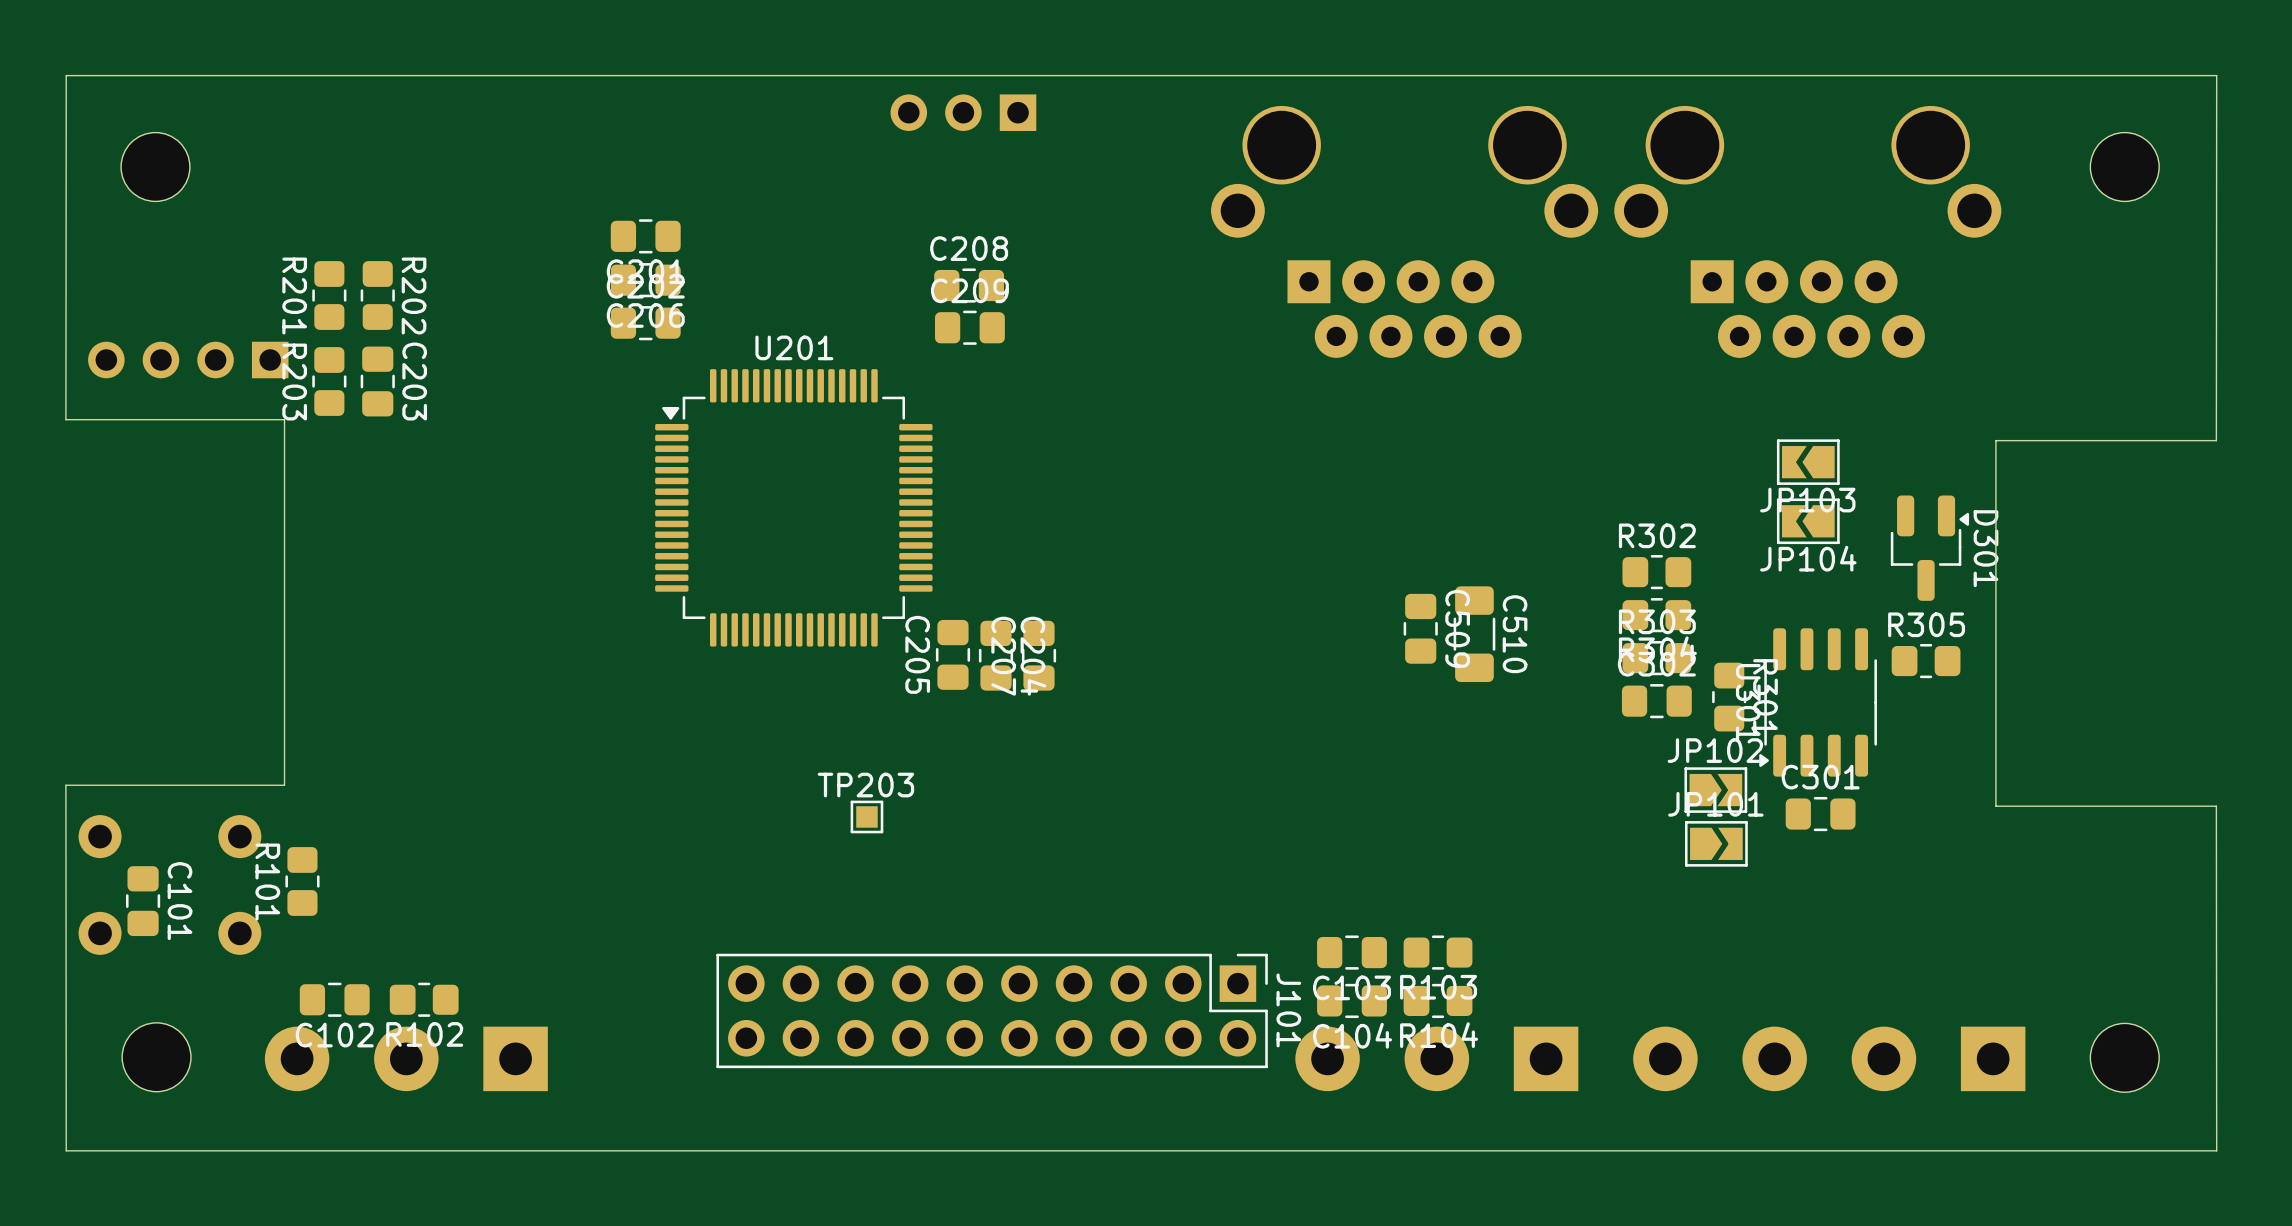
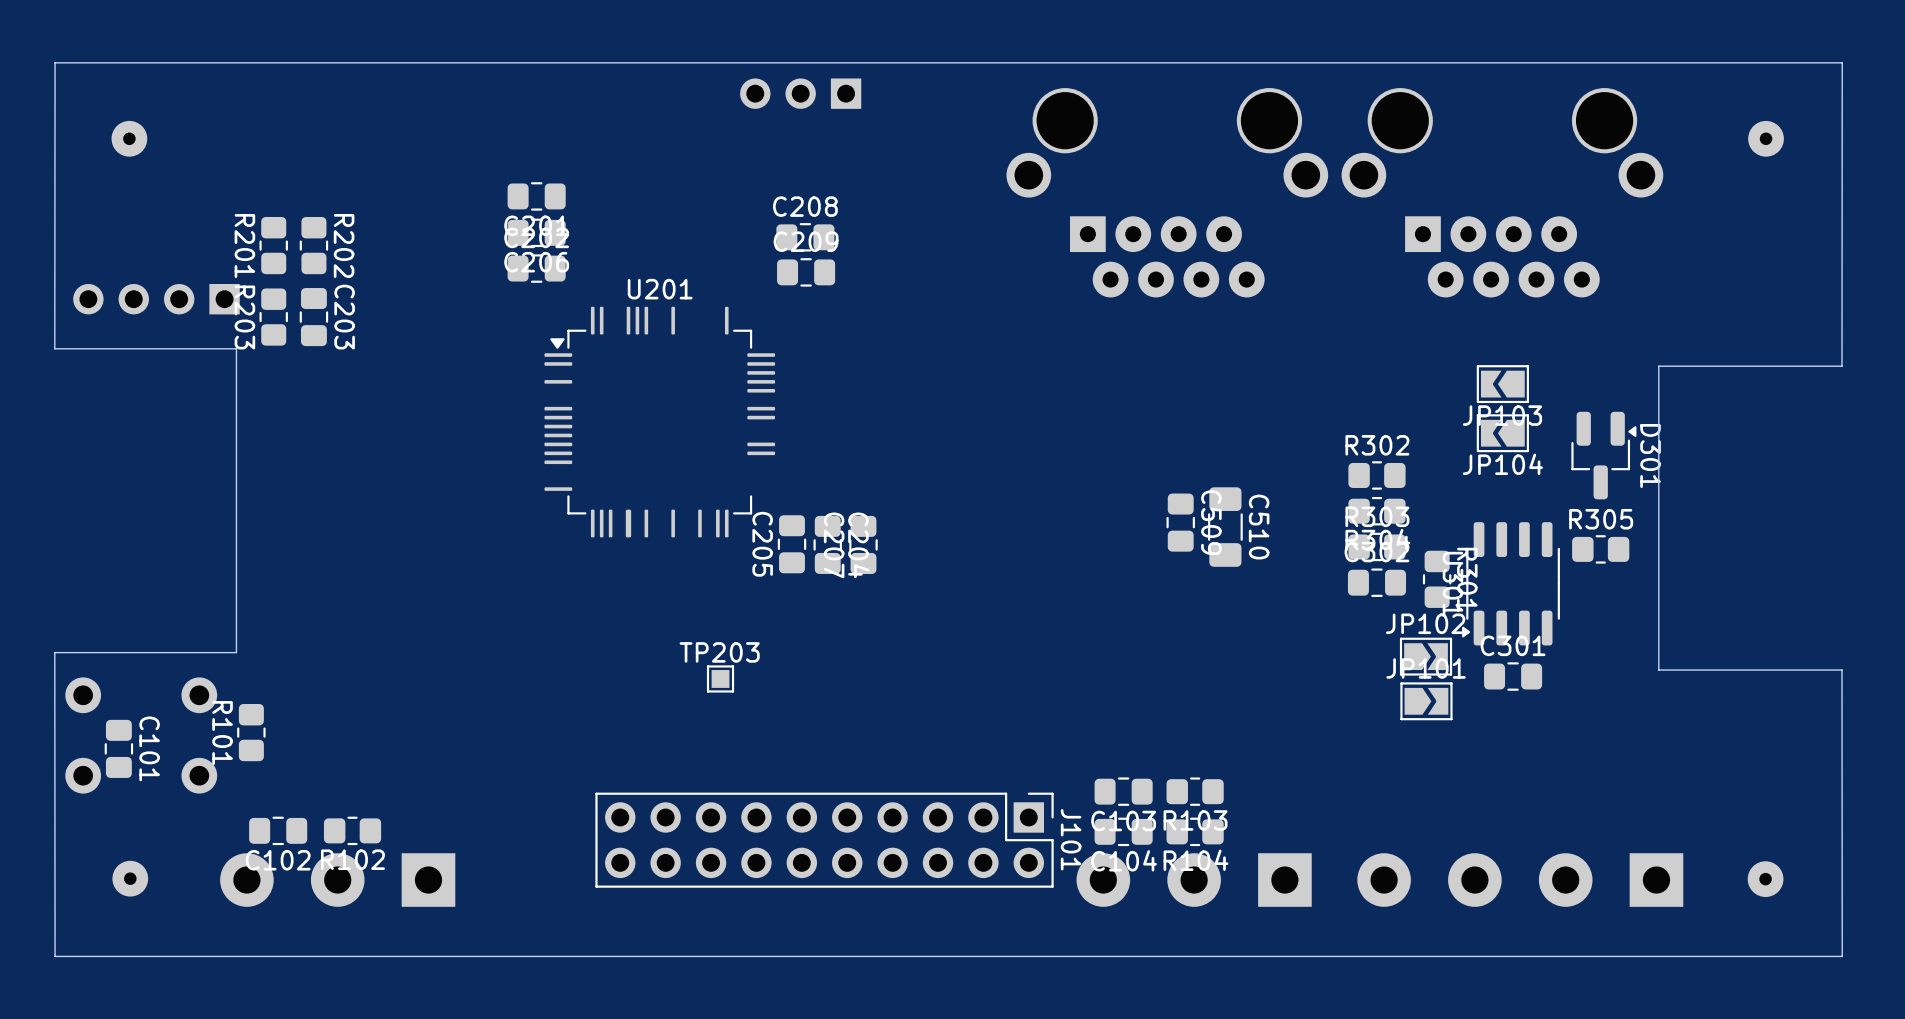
part footprint: [121, 132, 190, 202] -> [111, 120, 148, 157]
part footprint: [2090, 132, 2160, 202] -> [1748, 120, 1784, 157]
U201 footprint: [655, 369, 933, 647] -> [544, 306, 776, 538]
part footprint: [122, 1022, 191, 1092] -> [112, 860, 149, 897]
part footprint: [2090, 1023, 2160, 1093] -> [1747, 861, 1784, 898]

